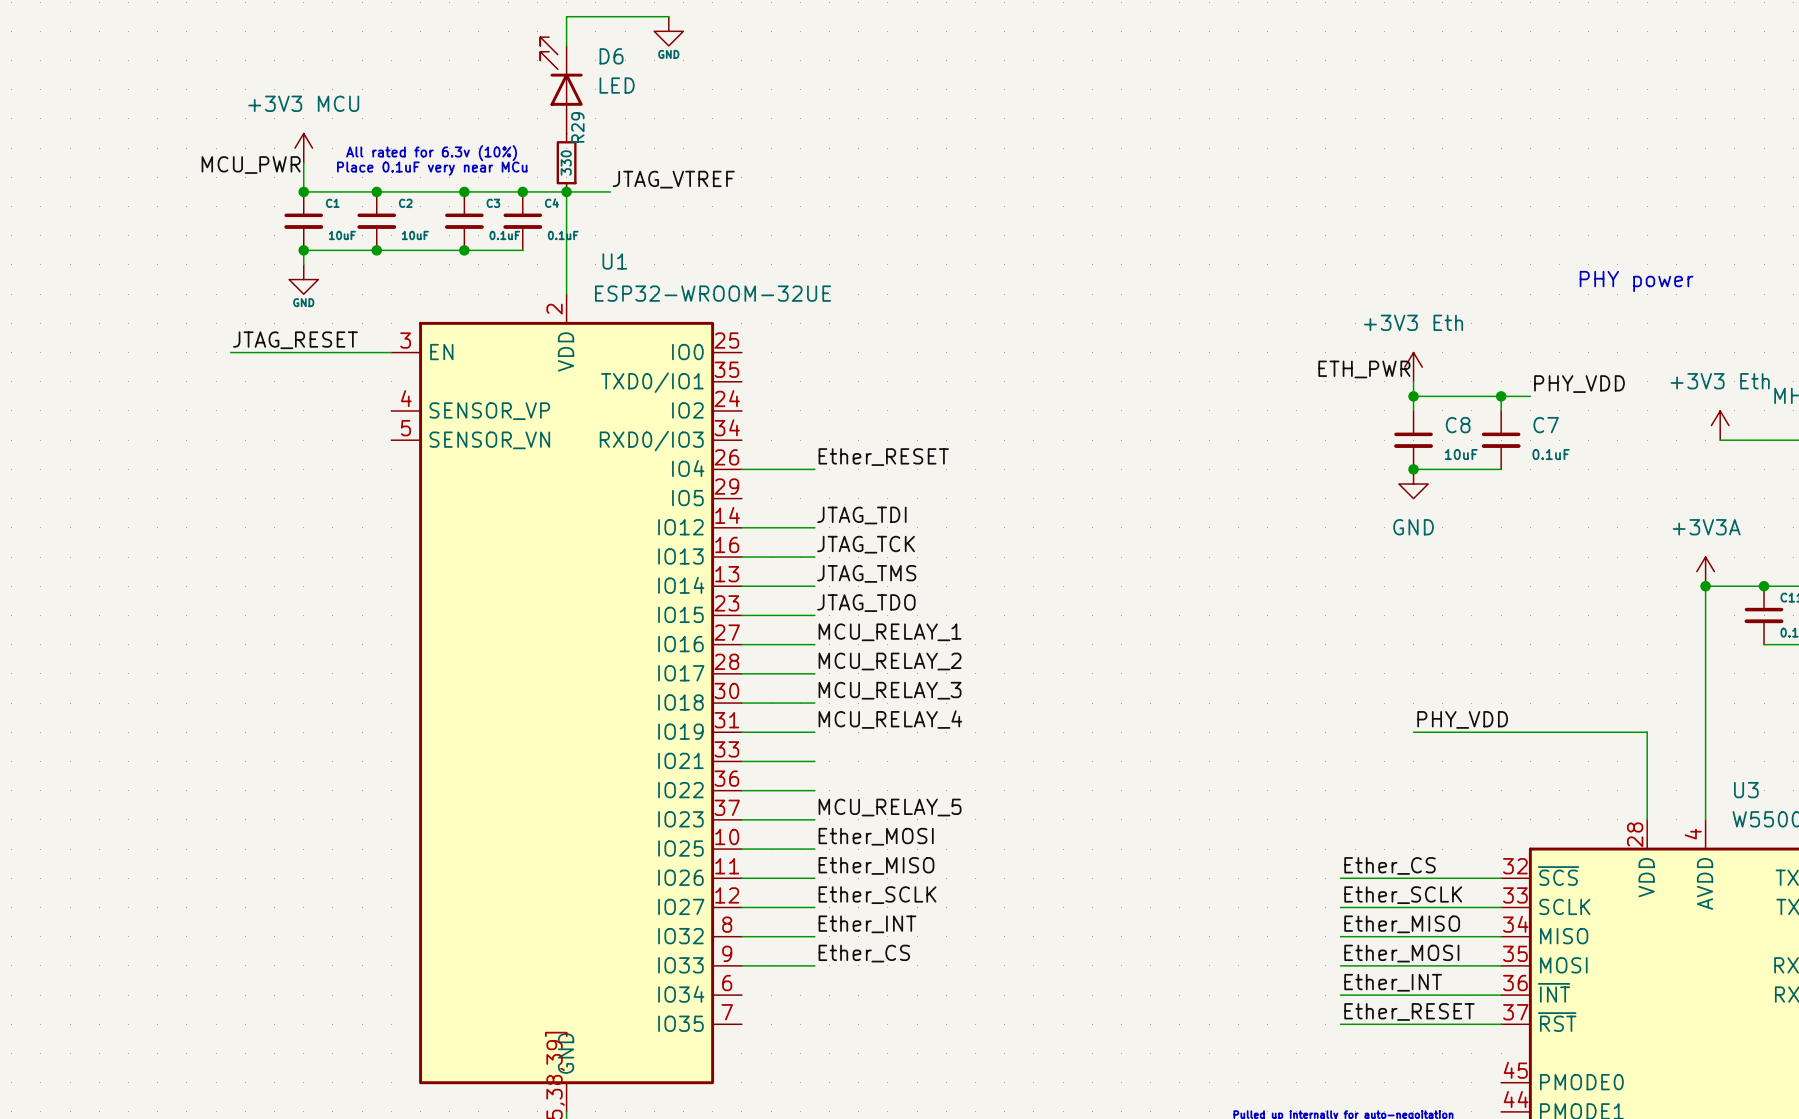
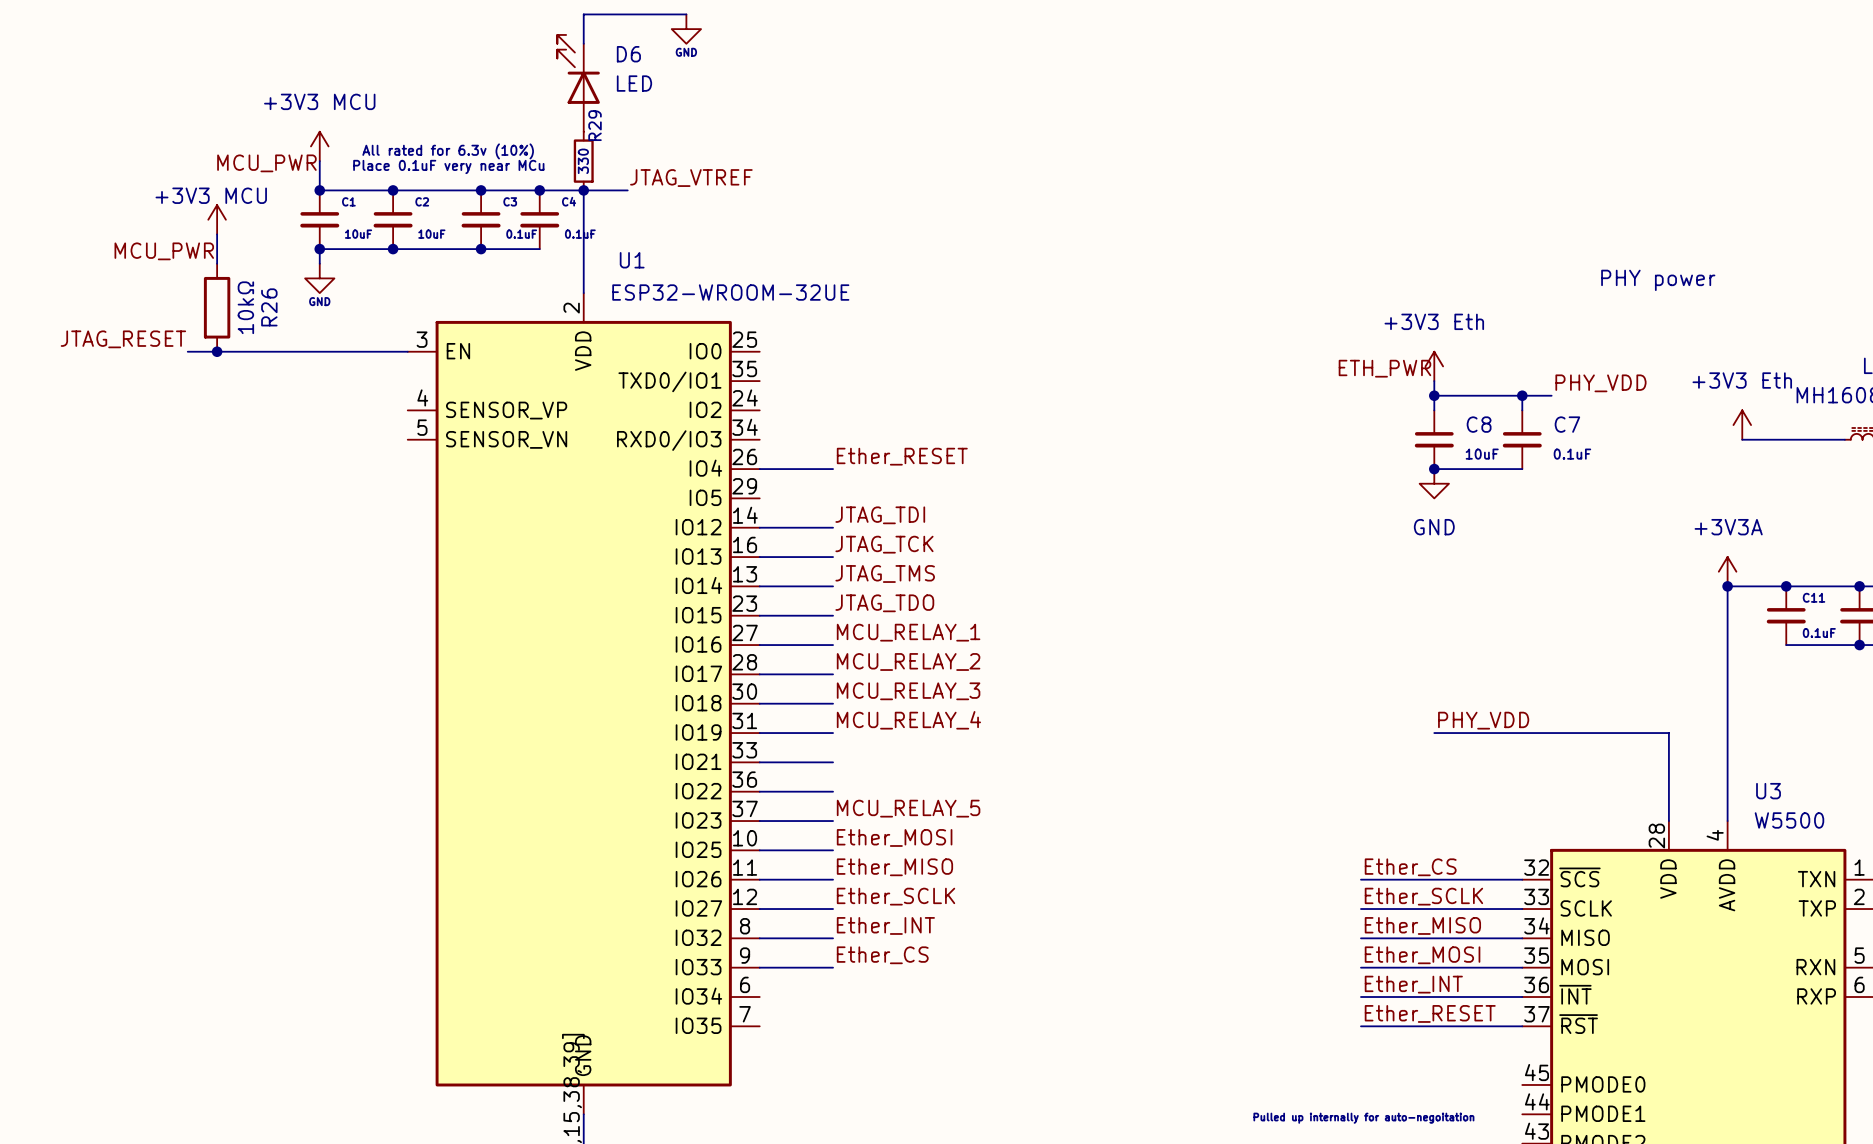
power symbol: none -> +3V3 MCU (217, 219)
wire: none -> (217, 234) (217, 263)
label: none -> MCU_PWR (164, 251)
R26: none -> 10kΩ (217, 307)
label position: JTAG_RESET (295, 340) -> JTAG_RESET (123, 339)
wire: none -> (187, 351) (246, 351)
junction: none -> (217, 351)

